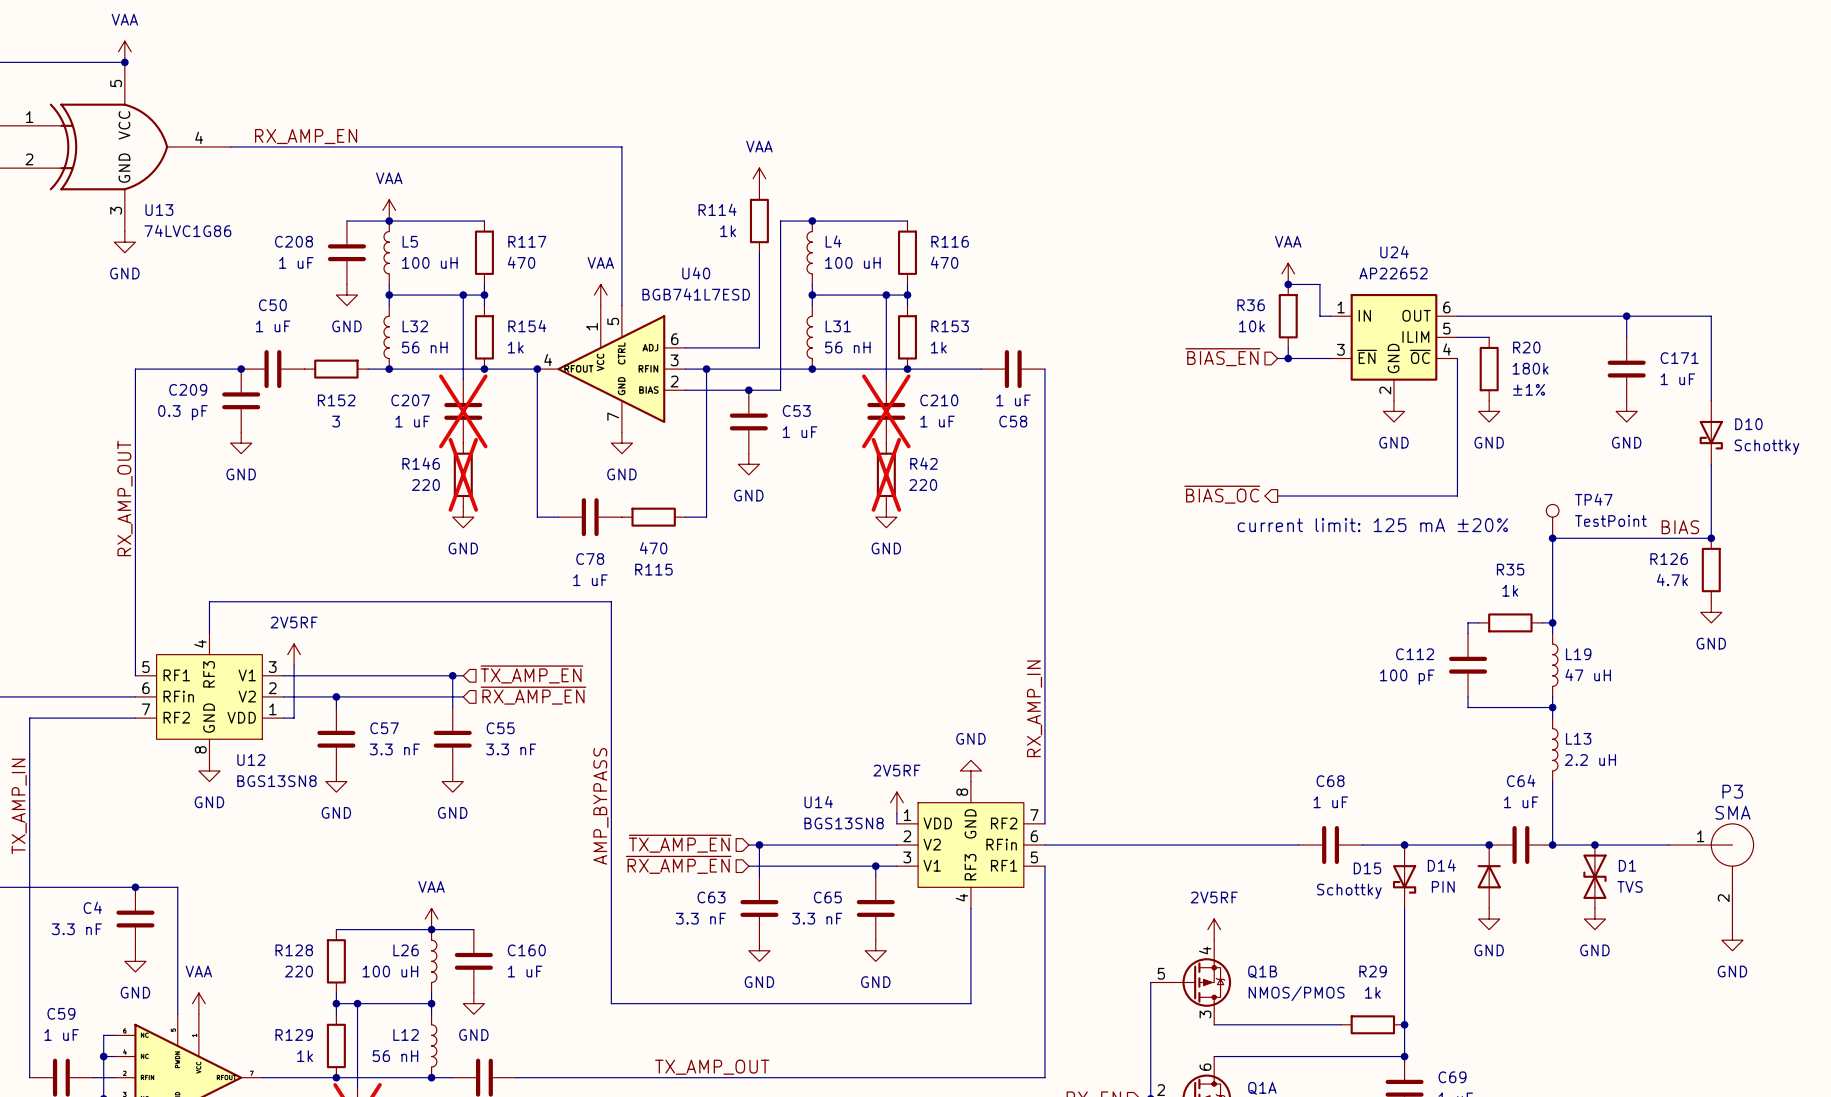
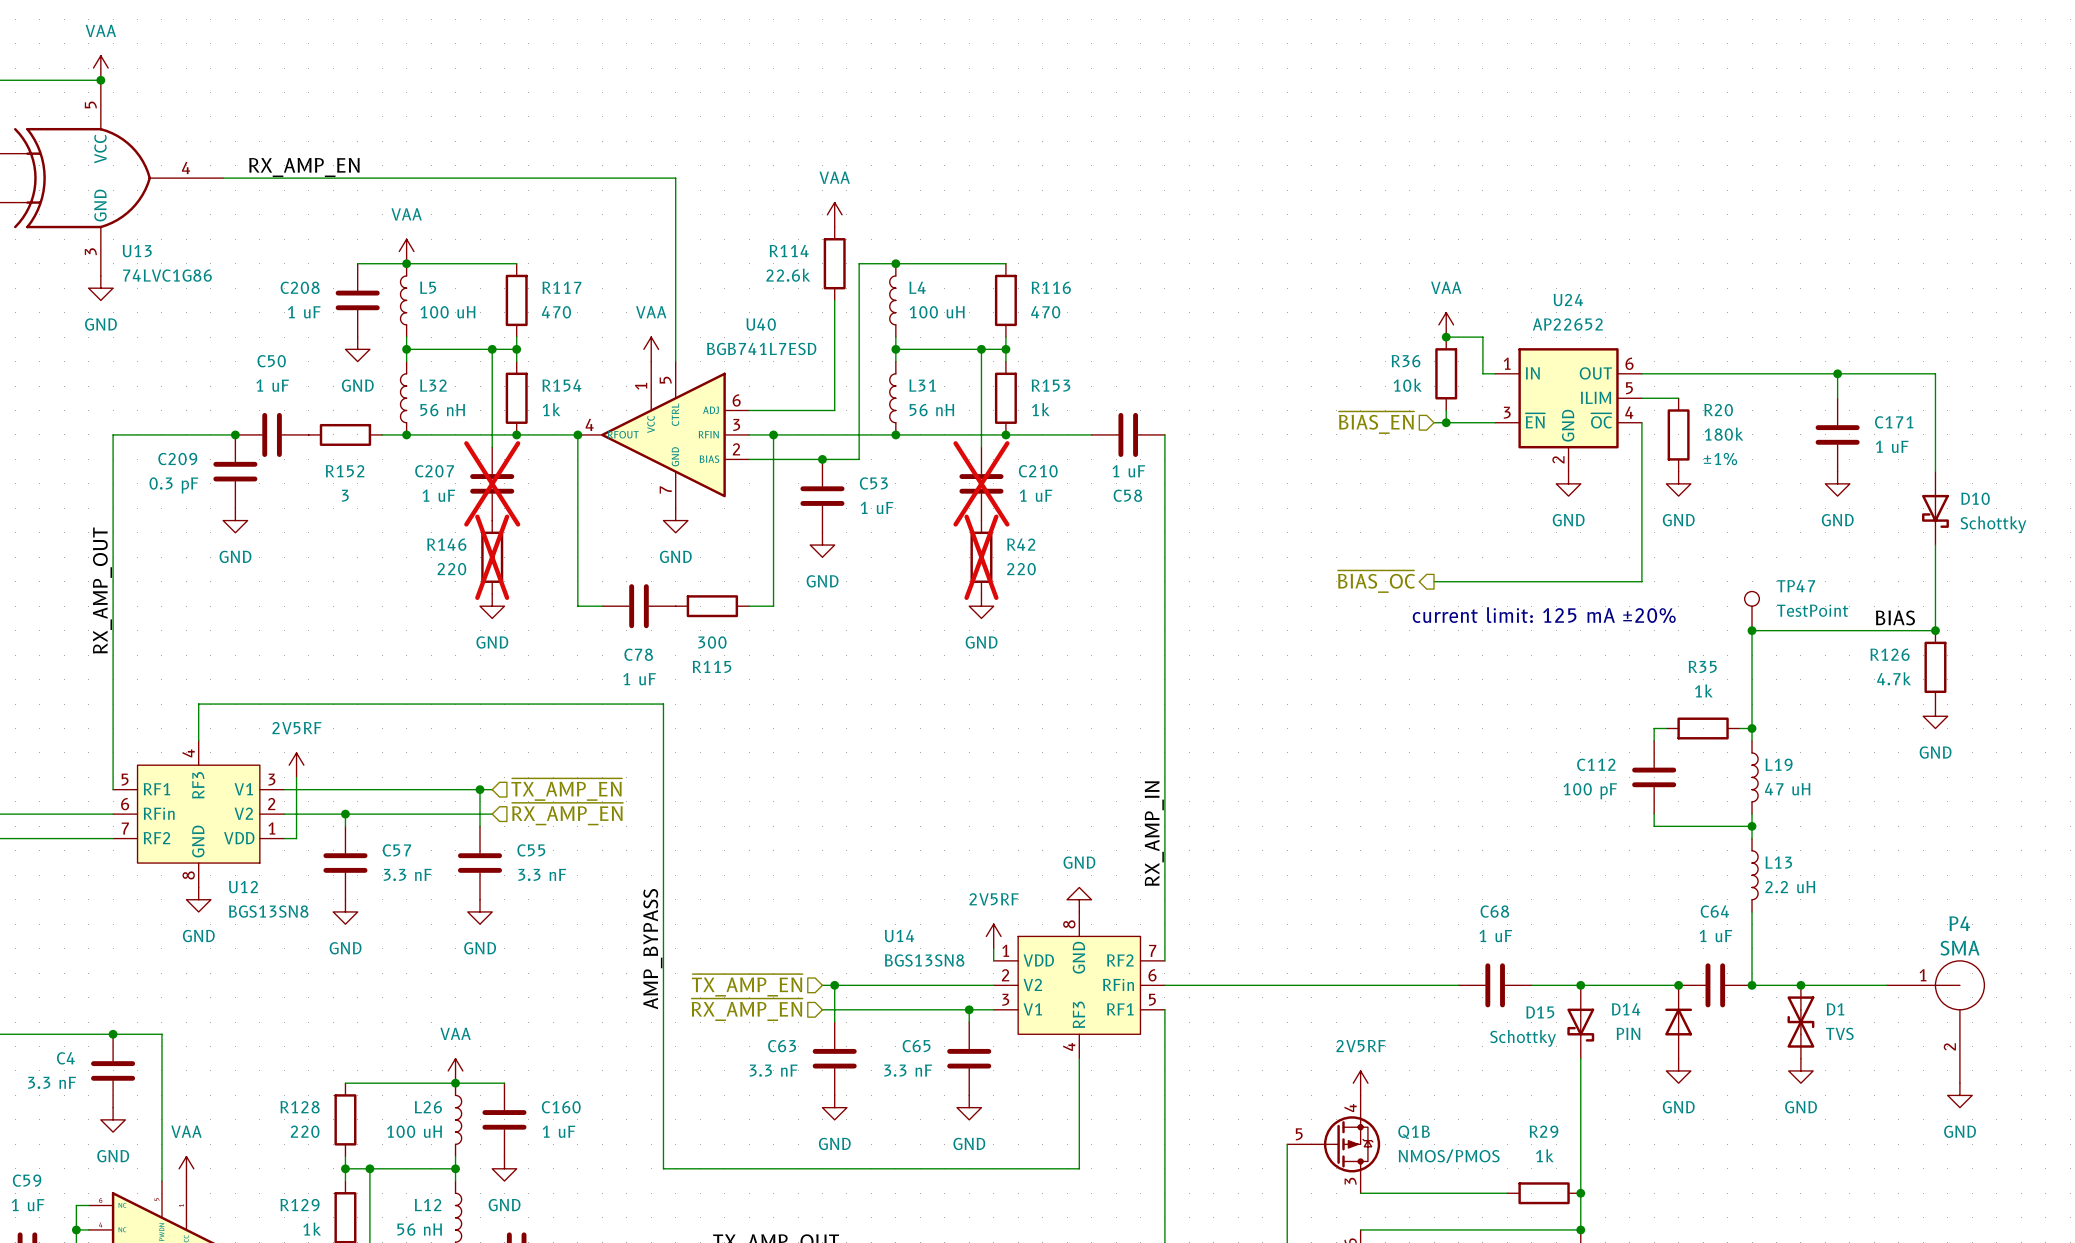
R114 value: 1k (728, 231) -> 22.6k (788, 275)
R115 value: 470 (653, 548) -> 300 (712, 642)
P3 name: P3 (1732, 791) -> P4 (1959, 923)

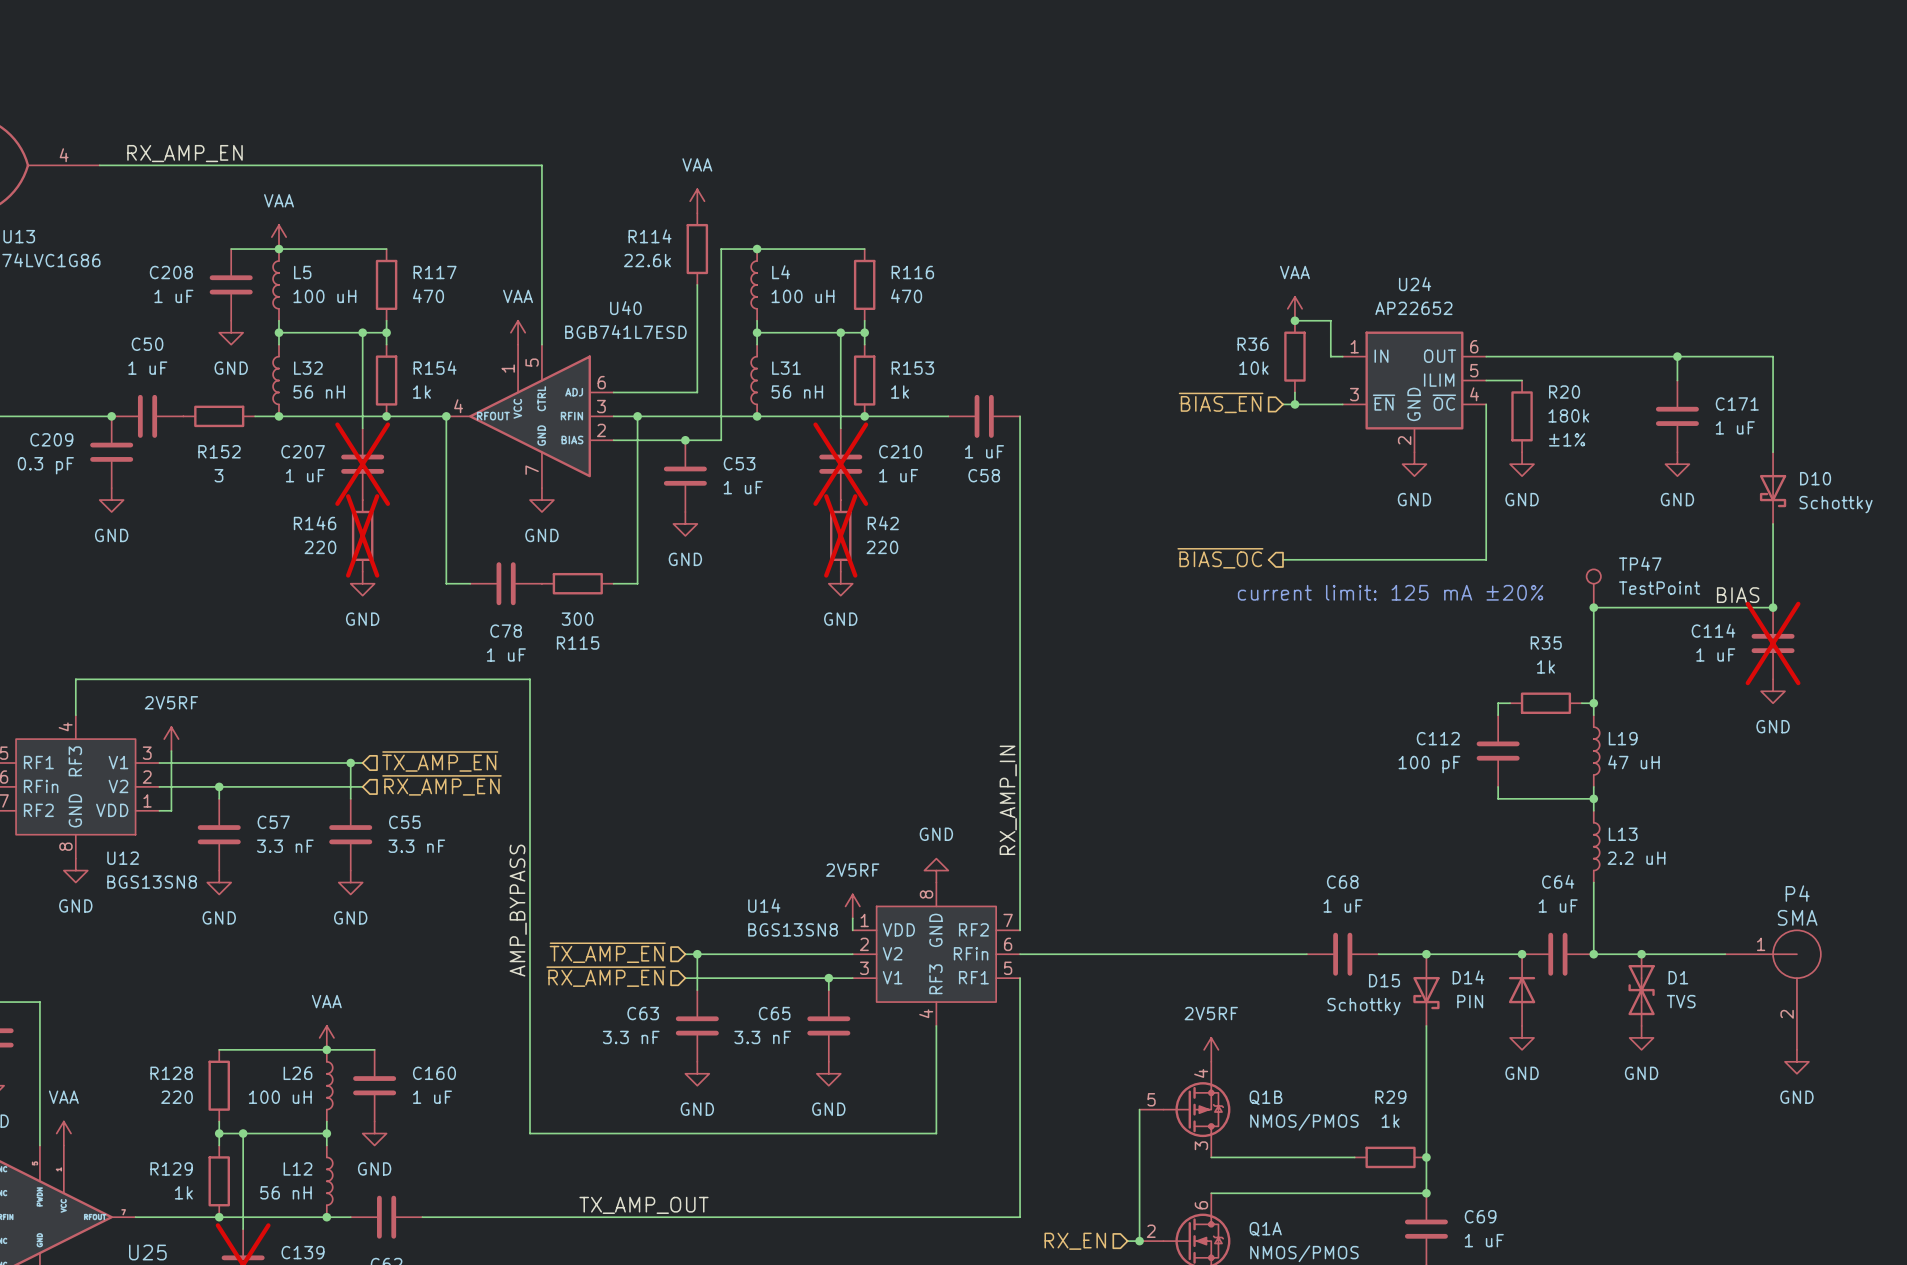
R126: 4.7k (1935, 667) -> none
C114: none -> 1 uF (1773, 643)

